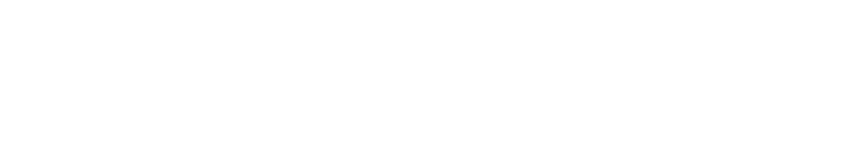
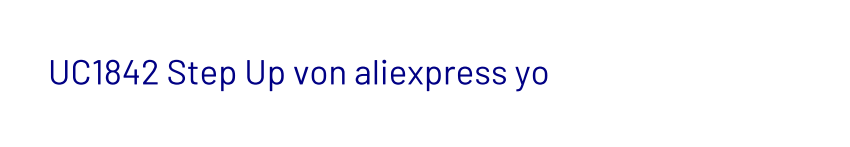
text: none -> UC1842 Step Up von aliexpress yo (299, 75)

